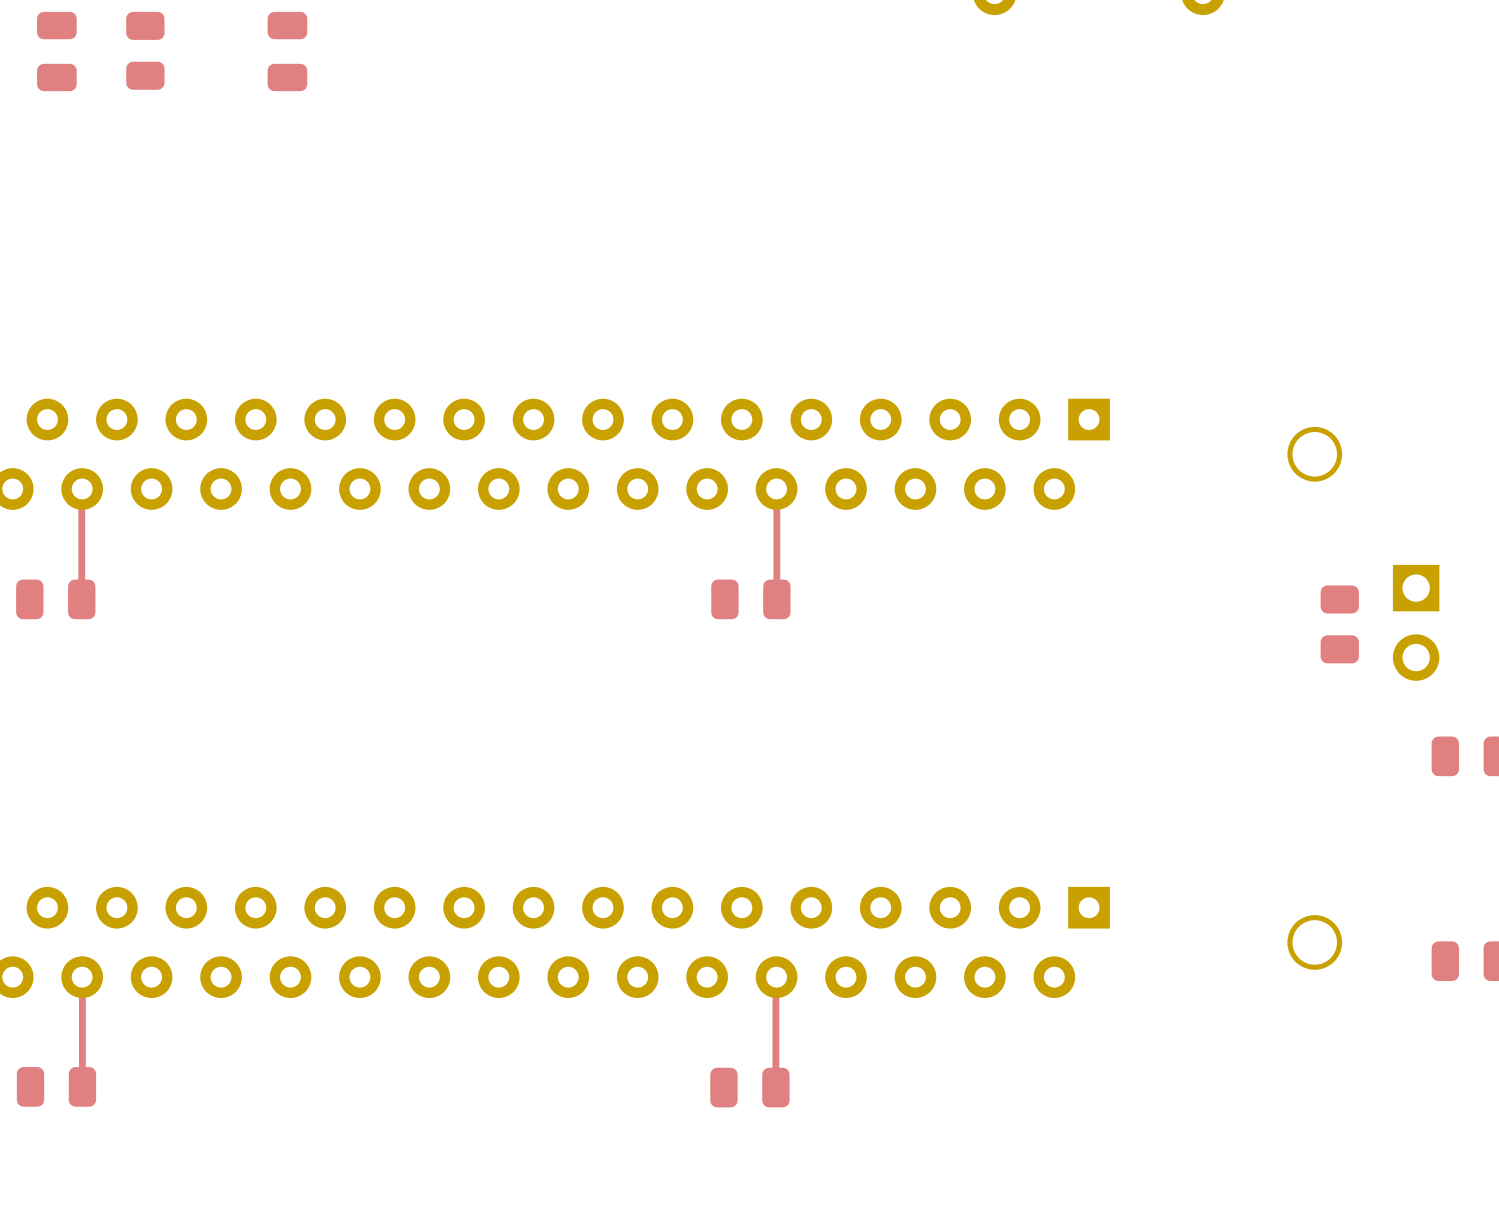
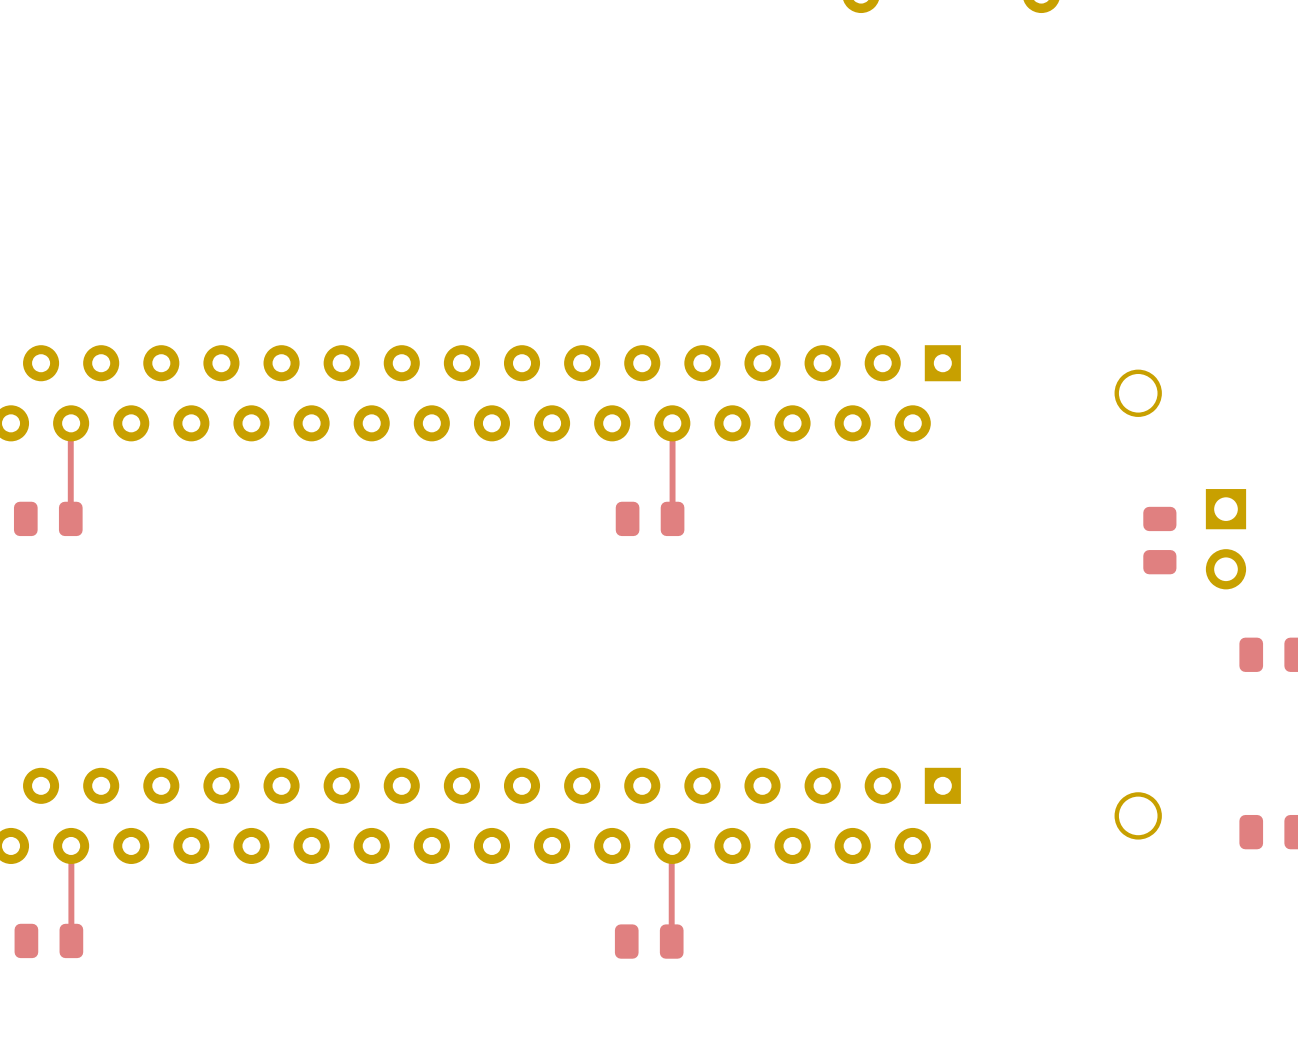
part: (145, 50) -> none
part: (56, 51) -> none
part: (287, 51) -> none

